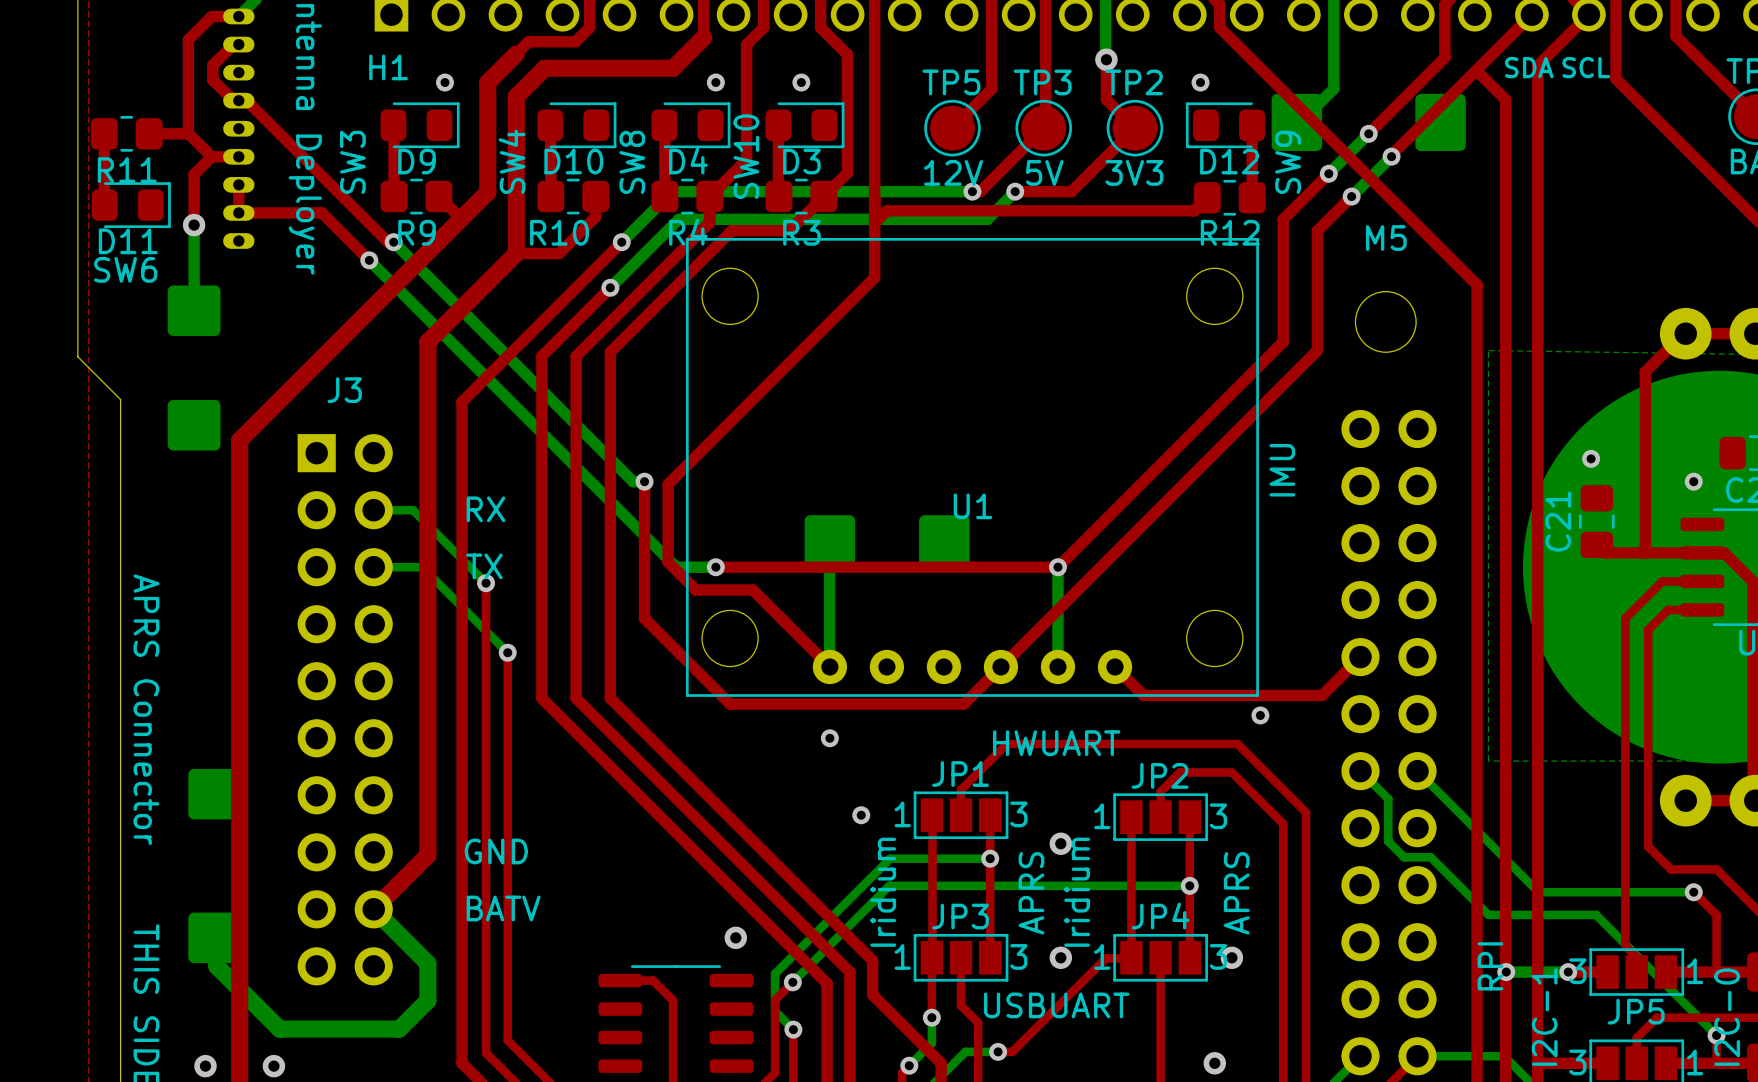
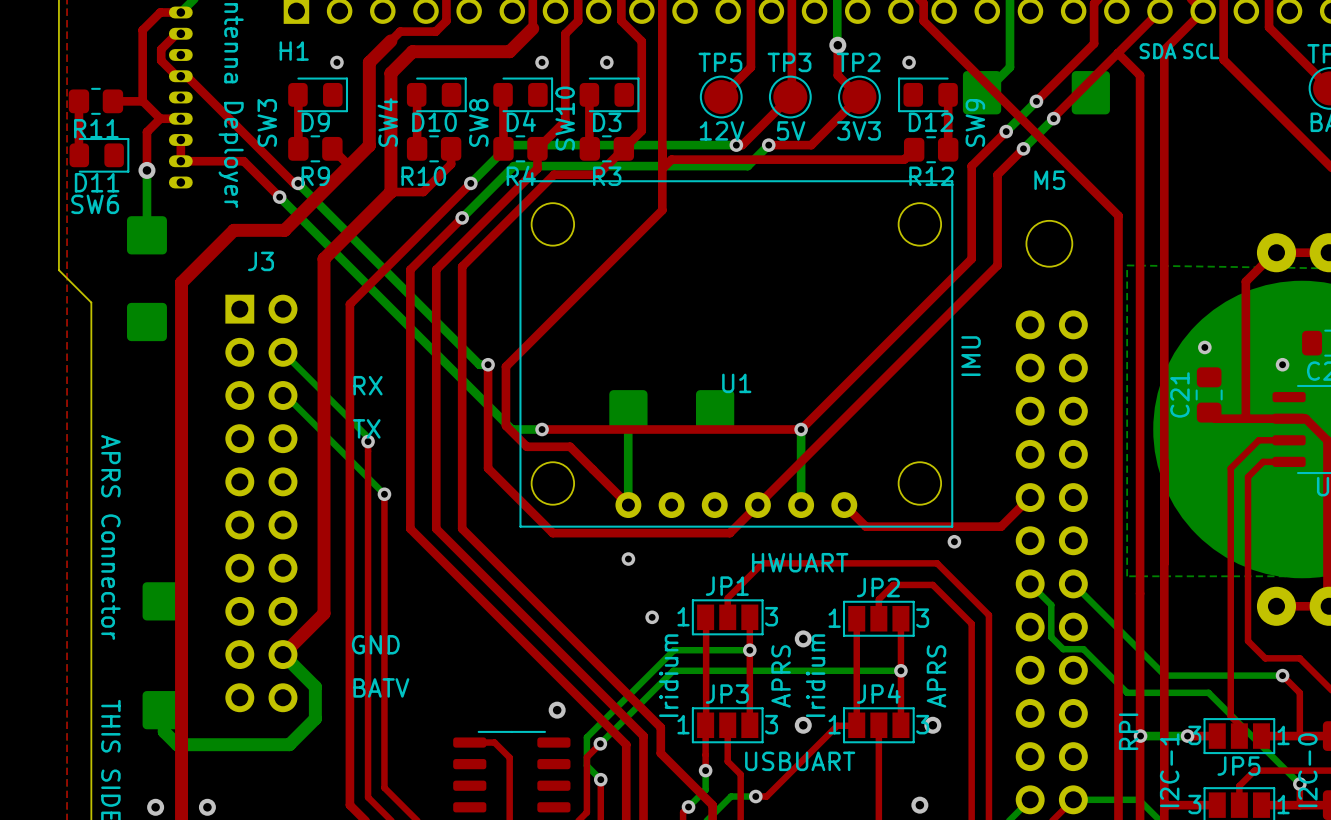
top track: (375, 304) (239, 440) -> (284, 230) (233, 230) (181, 282) (181, 333)
bottom track: (373, 510) (413, 510) (486, 583) -> (282, 352) (368, 437) (368, 441)
bottom track: (373, 567) (422, 567) -> (282, 395) (285, 395) (319, 429)
J3 position: (345, 709) -> (261, 503)
top track: (427, 810) (427, 855) (373, 909) -> (324, 613) (282, 654)
bottom track: (373, 909) (427, 963) (427, 1000) (399, 1029) (279, 1029) (234, 983) -> (282, 654) (315, 686) (315, 718) (289, 744) (177, 744)

